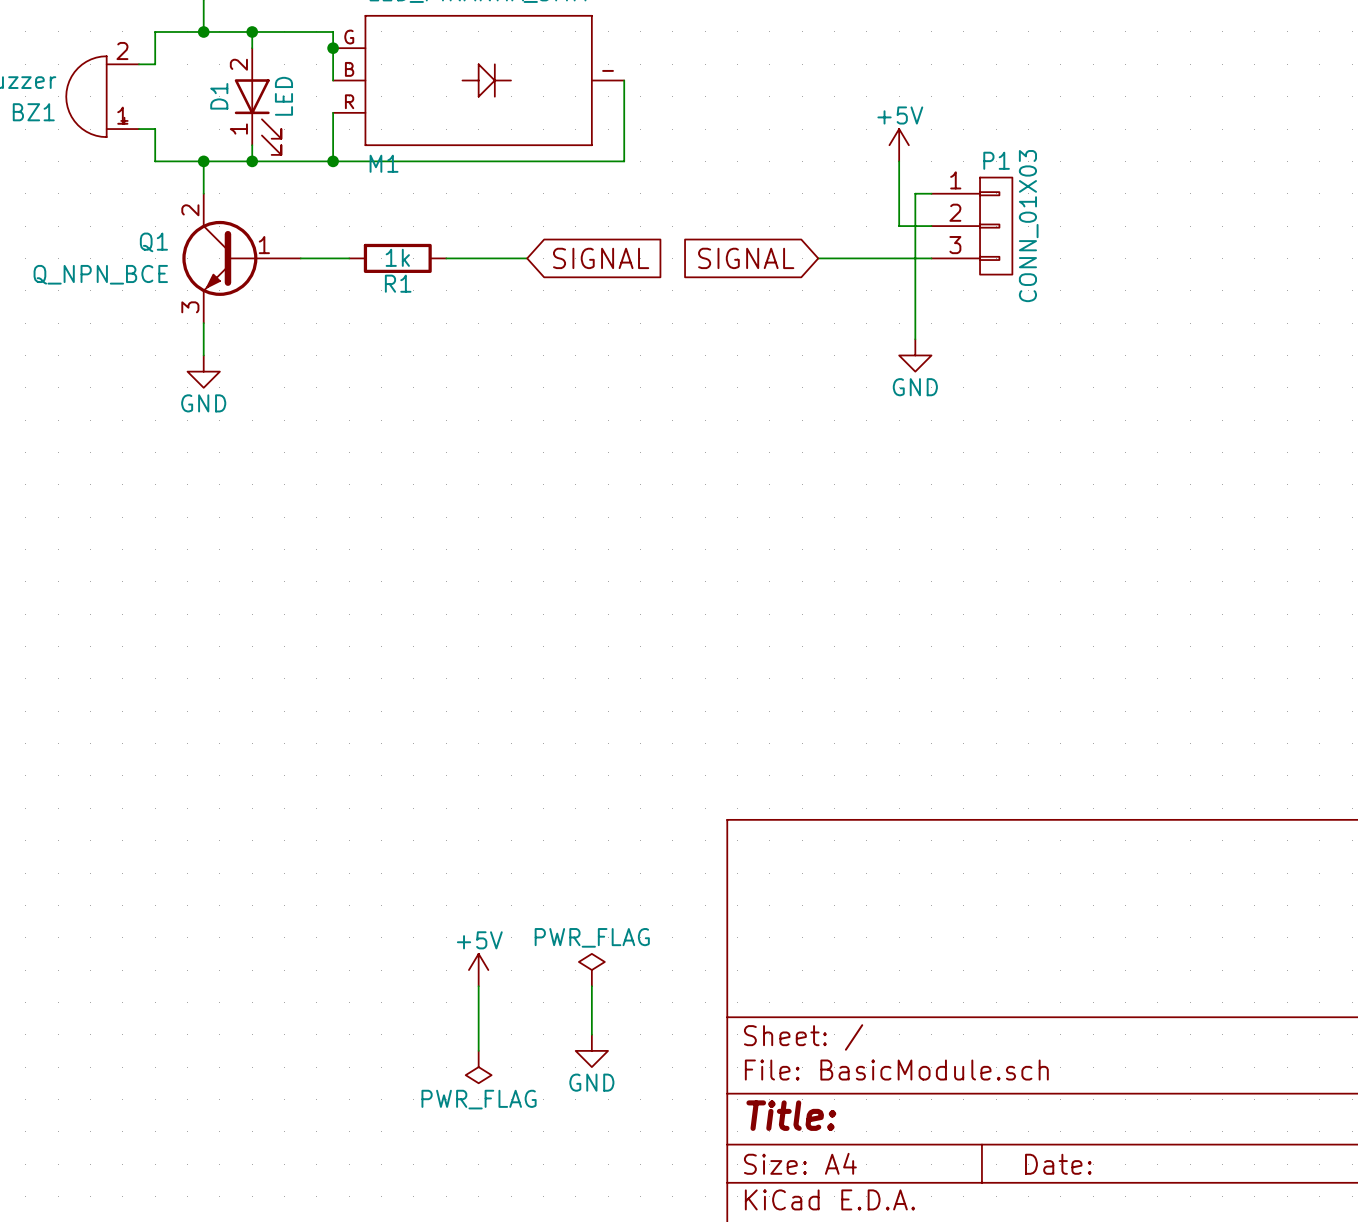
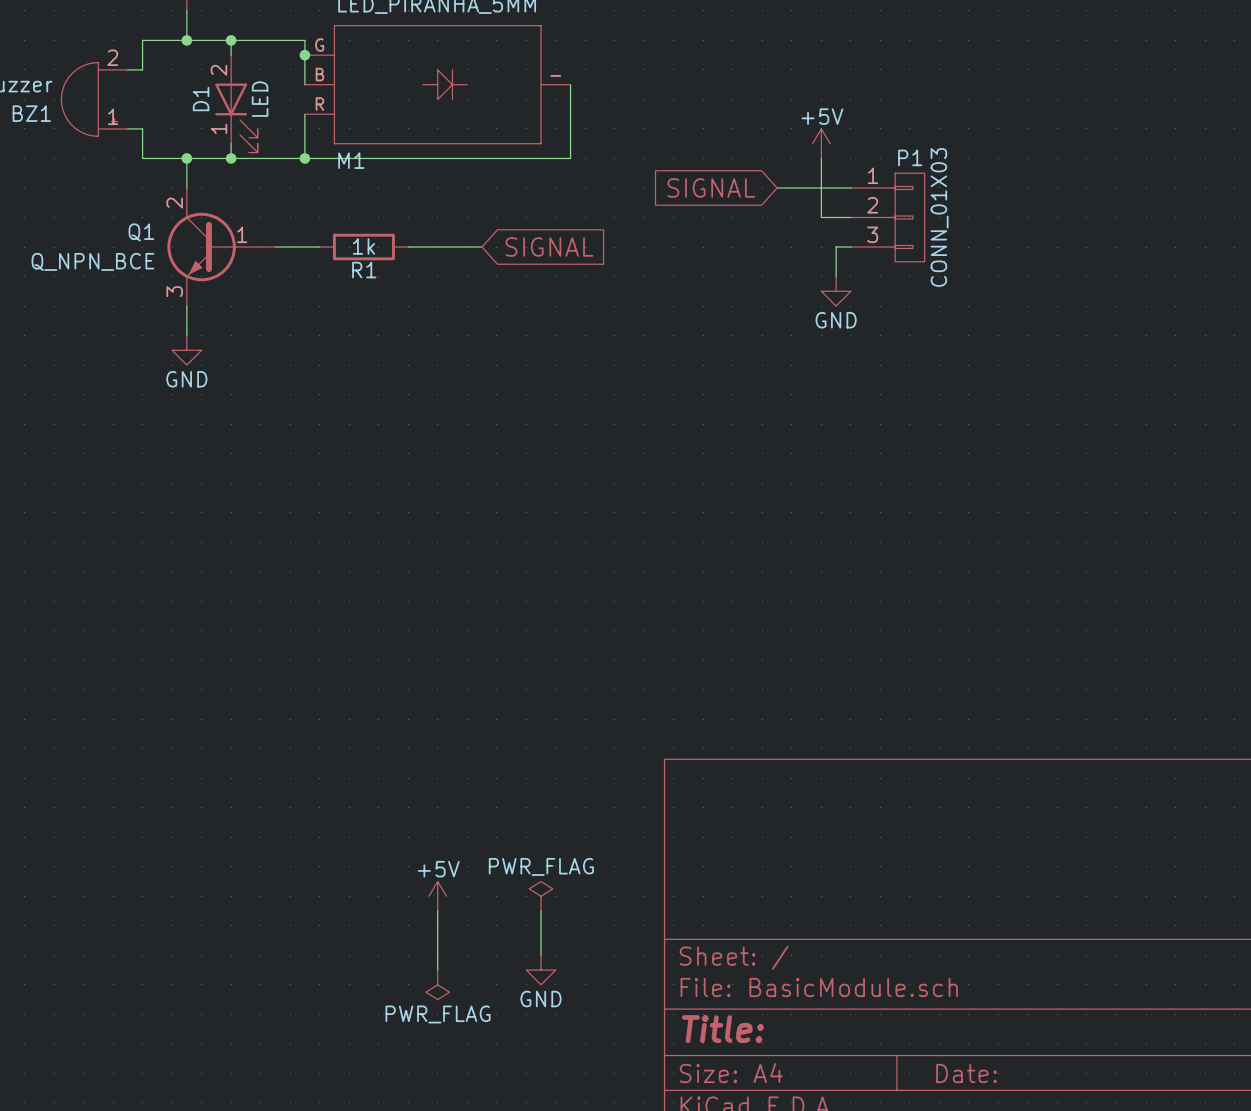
wire: (915, 193) (915, 258) (818, 258) -> (836, 187) (777, 187)
global label position: SIGNAL (746, 258) -> SIGNAL (711, 187)
wire: (915, 290) (915, 339) -> none
power symbol position: GND (915, 355) -> GND (836, 291)

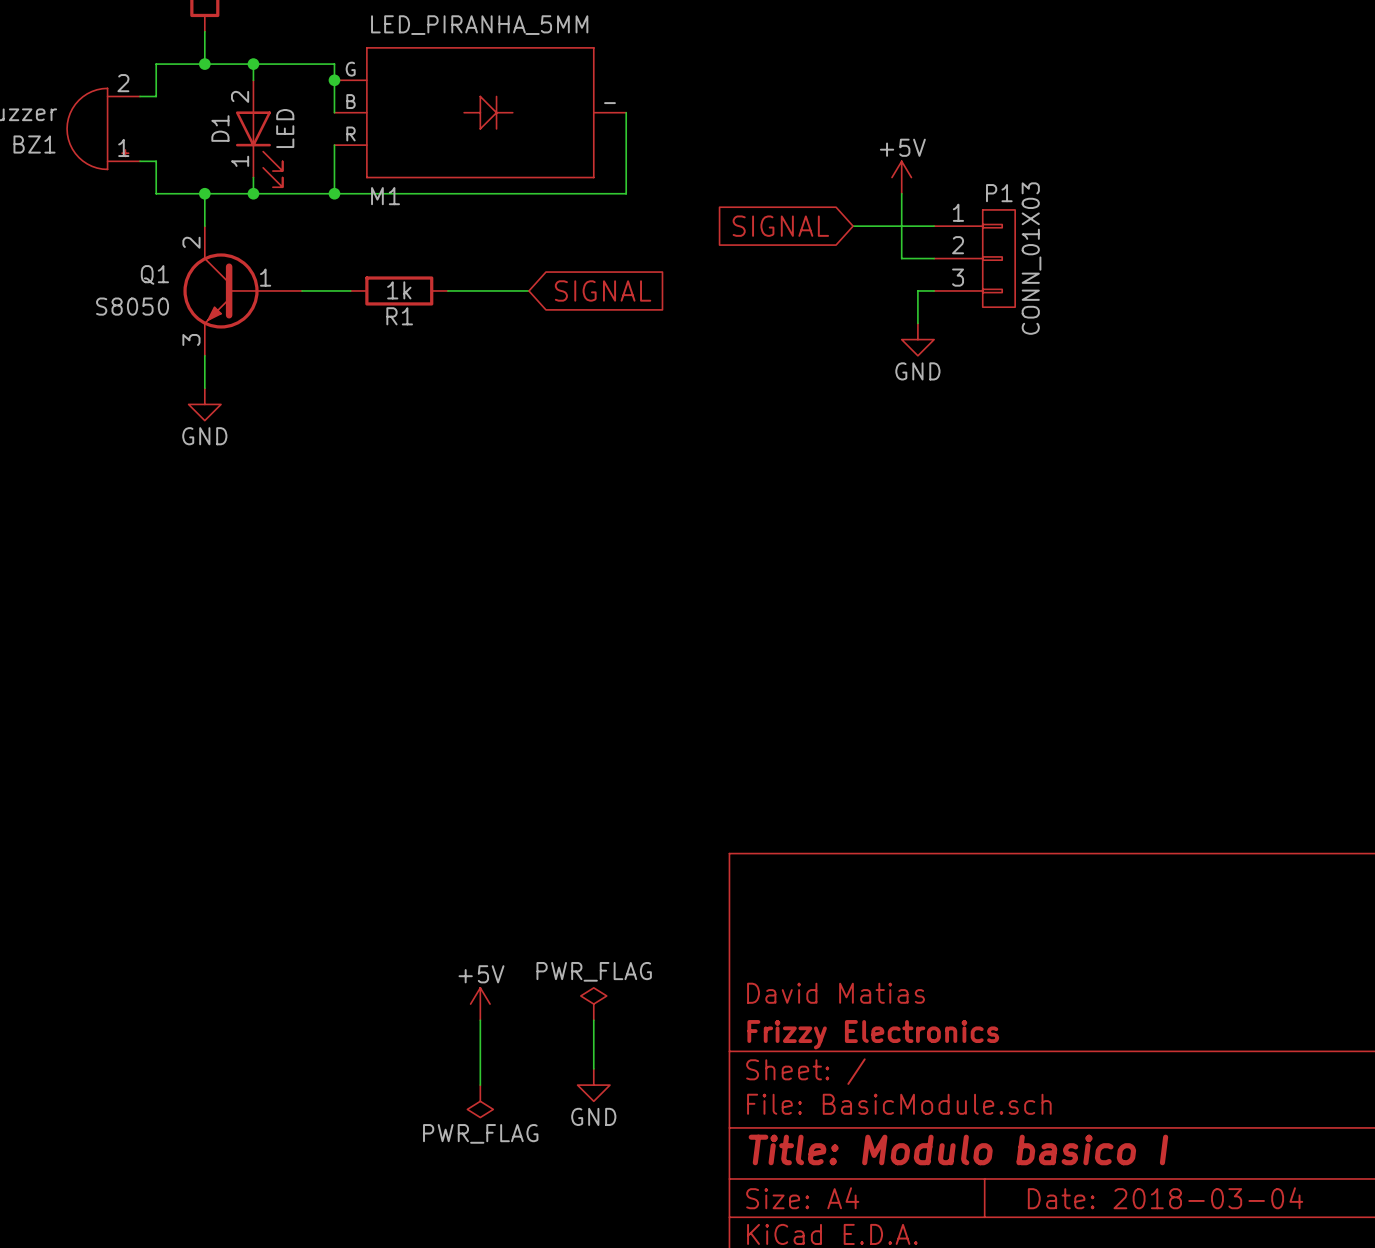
Q1 value: Q_NPN_BCE (92, 261) -> S8050 (132, 306)
title block: none -> David Matias (836, 993)
title block: none -> Frizzy Electronics (873, 1034)
title block: Title: (723, 1029) -> Title: Modulo basico I (958, 1149)
title block: Date: (966, 1073) -> Date: 2018-03-04 (1165, 1198)

